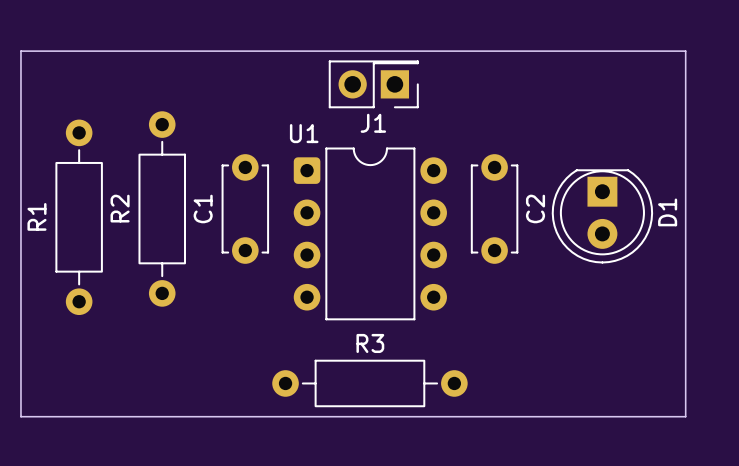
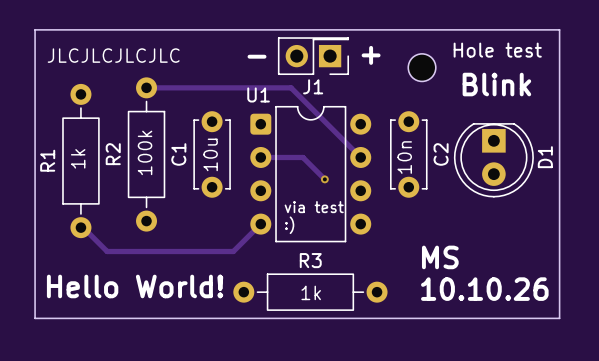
text: none -> JLCJLCJLCJLC (113, 55)
text: none -> + (371, 55)
text: none -> - (257, 56)
Hole test: none -> (422, 67)
text: none -> Blink (496, 84)
track: none -> (146, 87) (291, 87) (360, 157)
text: none -> 100k (145, 152)
text: none -> 10u (210, 154)
track: none -> (260, 157) (302, 157) (324, 179)
text: none -> 10n (404, 157)
text: none -> 1k (78, 158)
via: none -> (324, 179)
text: none -> via test (314, 207)
track: none -> (260, 224) (233, 251) (107, 251) (83, 227) (80, 227)
text: none -> :) (289, 225)
text: none -> MS (440, 257)
text: none -> Hello World! (135, 286)
text: none -> 10.10.26 (484, 289)
text: none -> 1k (311, 292)

